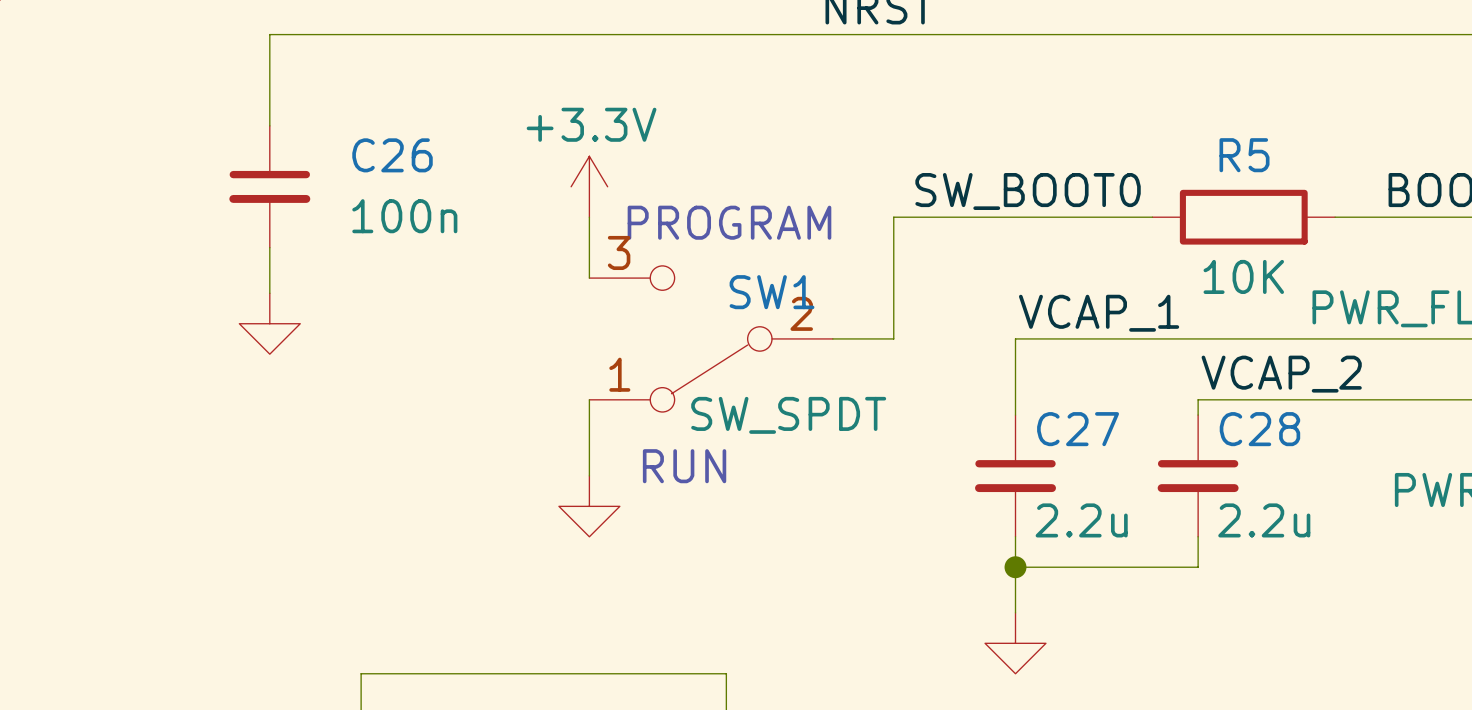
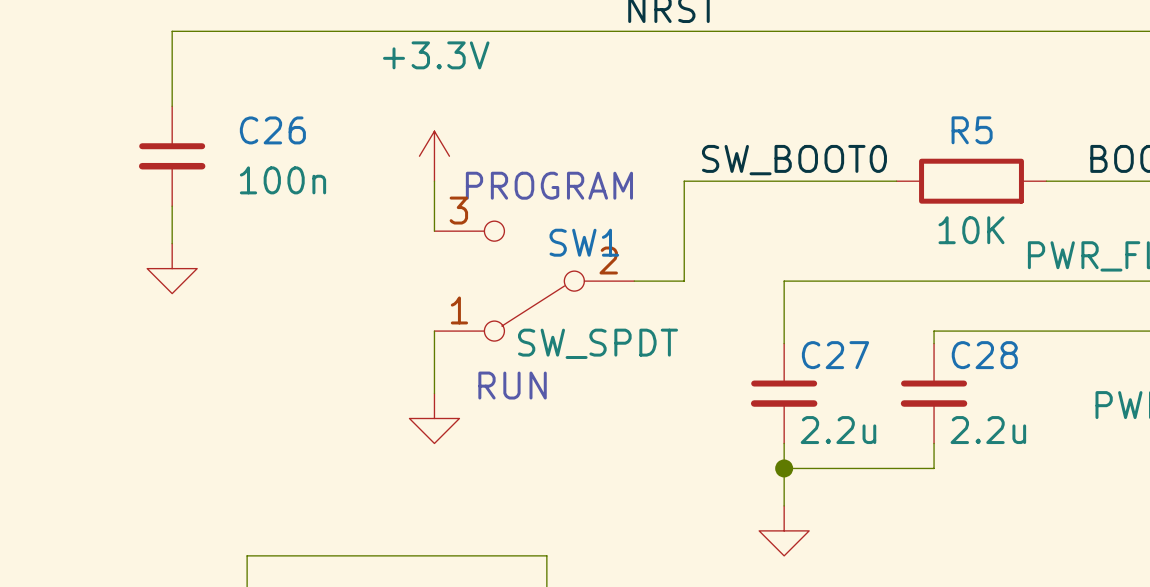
power symbol text position: +3.3V (591, 124) -> +3.3V (436, 55)
label: VCAP_1 (1099, 313) -> none
label: VCAP_2 (1281, 374) -> none

